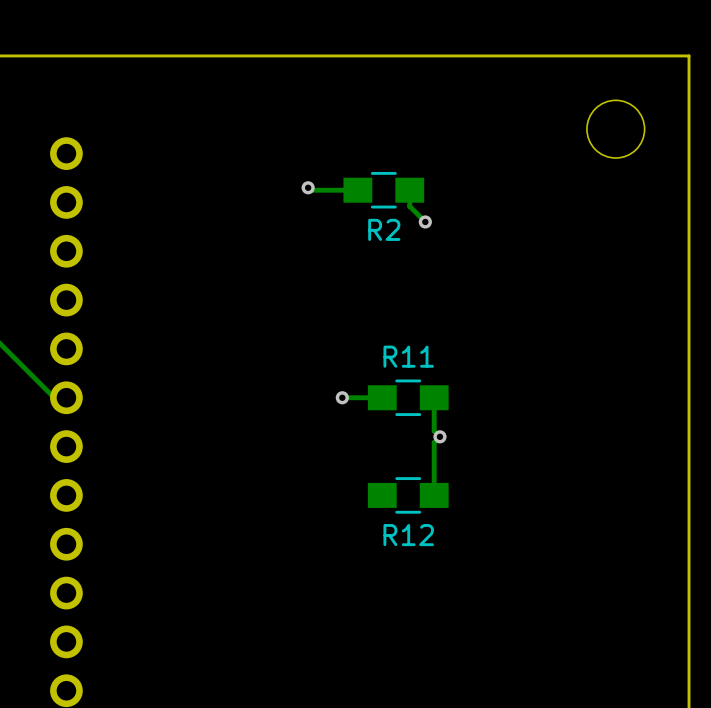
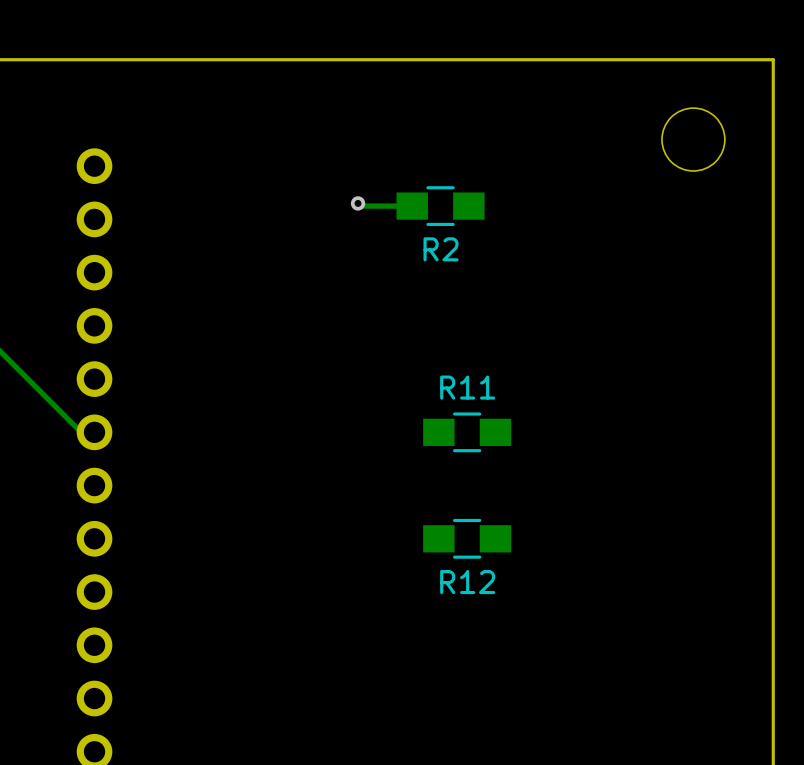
track: (409, 190) (409, 206) (425, 221) -> none
via: (425, 221) -> none
via: (342, 397) -> none
track: (382, 397) (342, 397) -> none
track: (434, 397) (434, 431) (439, 436) (434, 442) (434, 495) -> none
via: (439, 436) -> none

